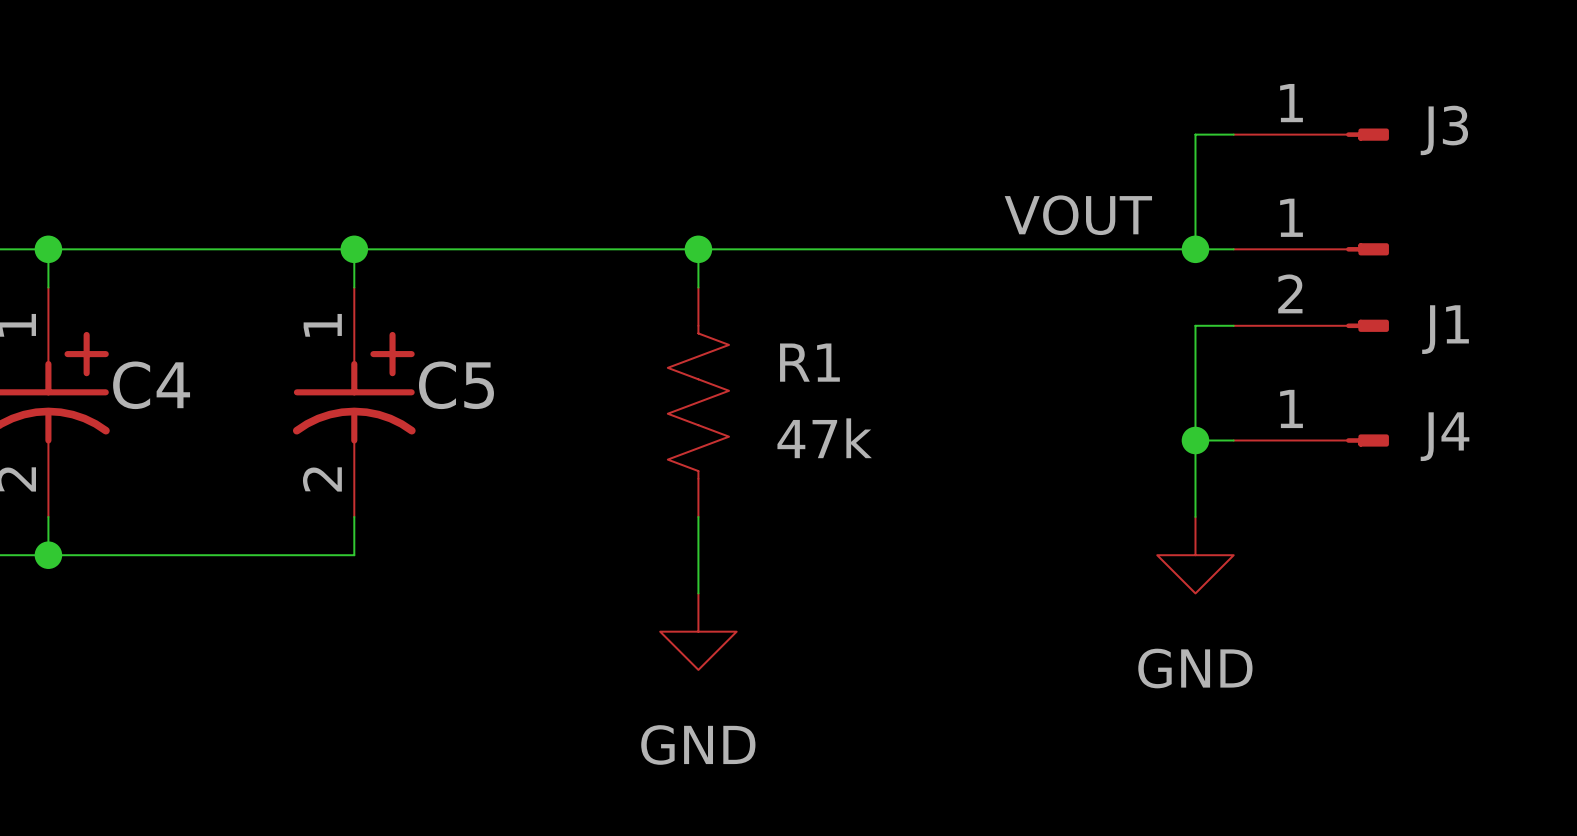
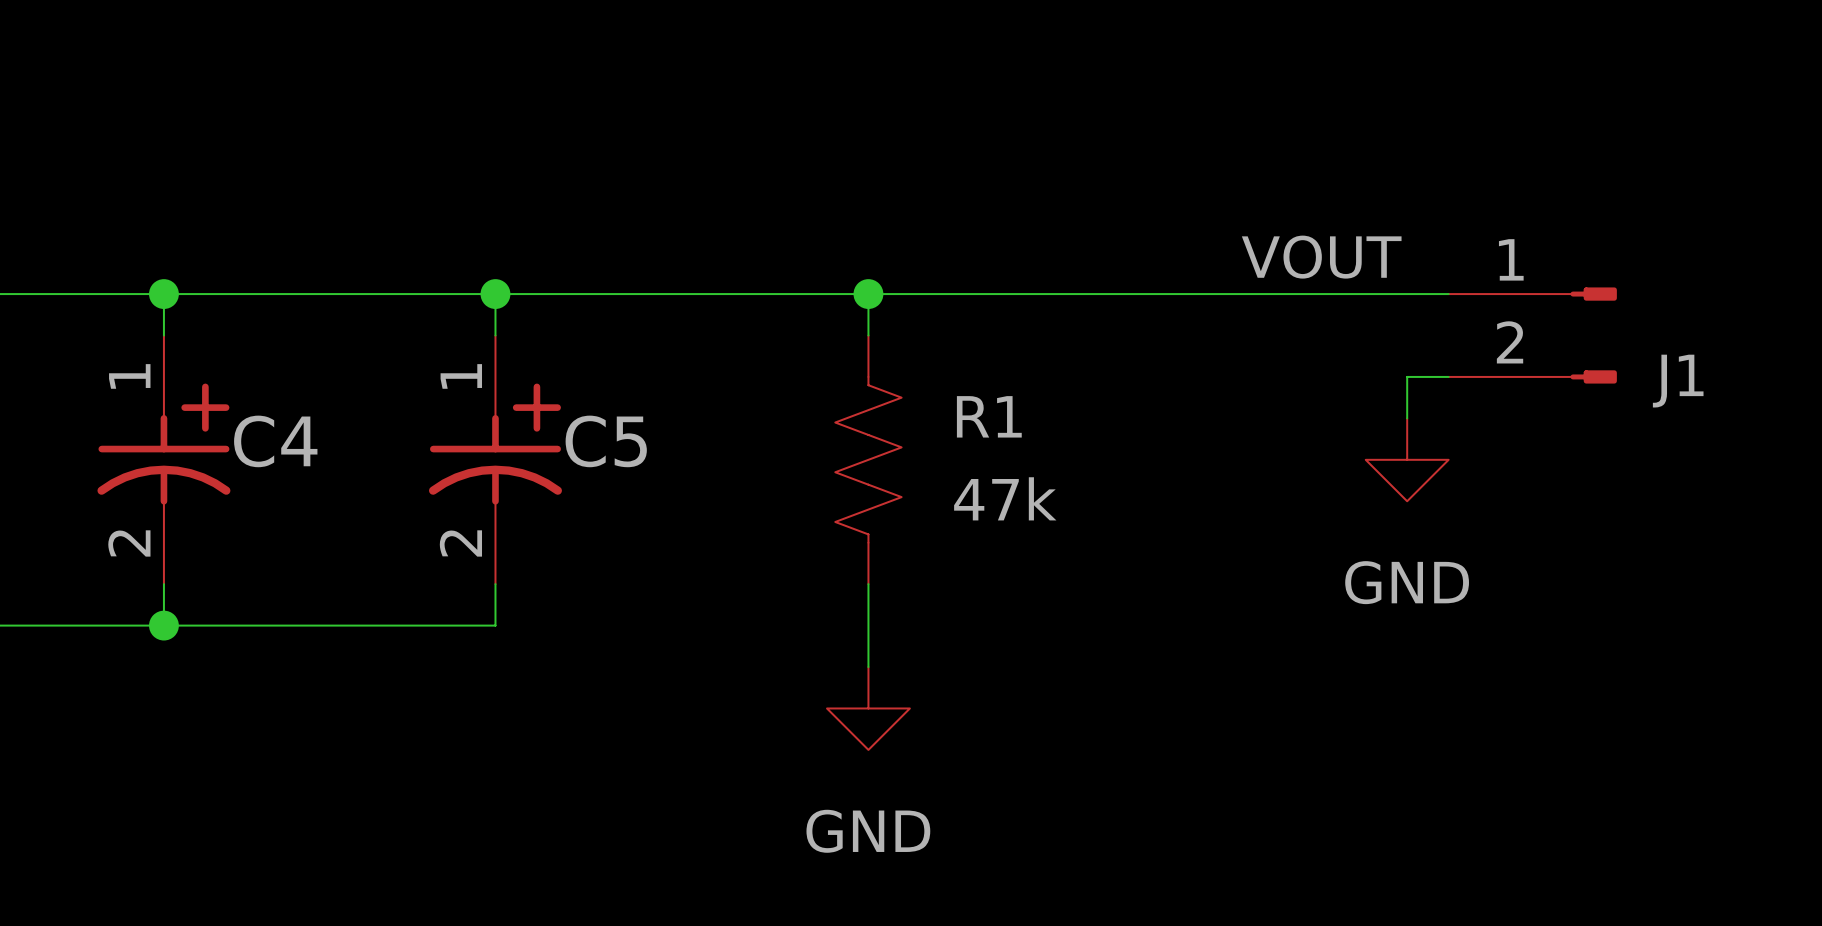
wire: (1233, 134) (1195, 134) (1195, 249) -> none
J3: (1311, 134) -> none
label position: VOUT (1078, 215) -> VOUT (1321, 257)
junction: (1195, 249) -> none
wire: (1195, 364) (1195, 516) -> none
wire: (1195, 440) (1233, 440) -> none
junction: (1195, 440) -> none
J4: (1311, 440) -> none
power symbol position: GND (1195, 555) -> GND (1407, 459)

